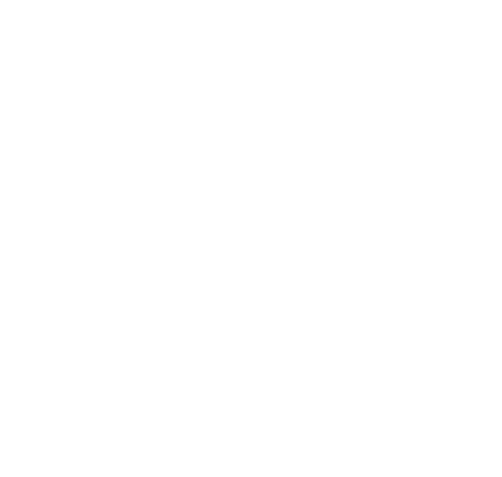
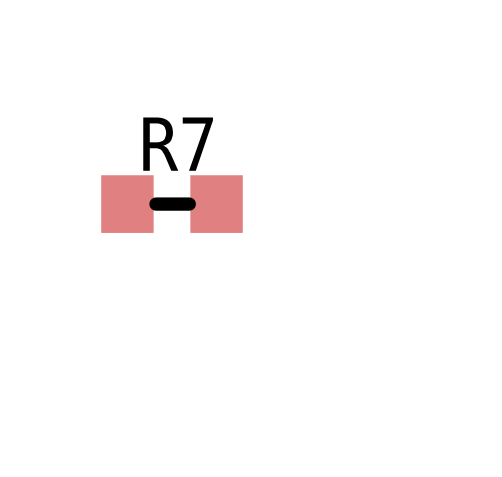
R7: none -> (171, 204)

